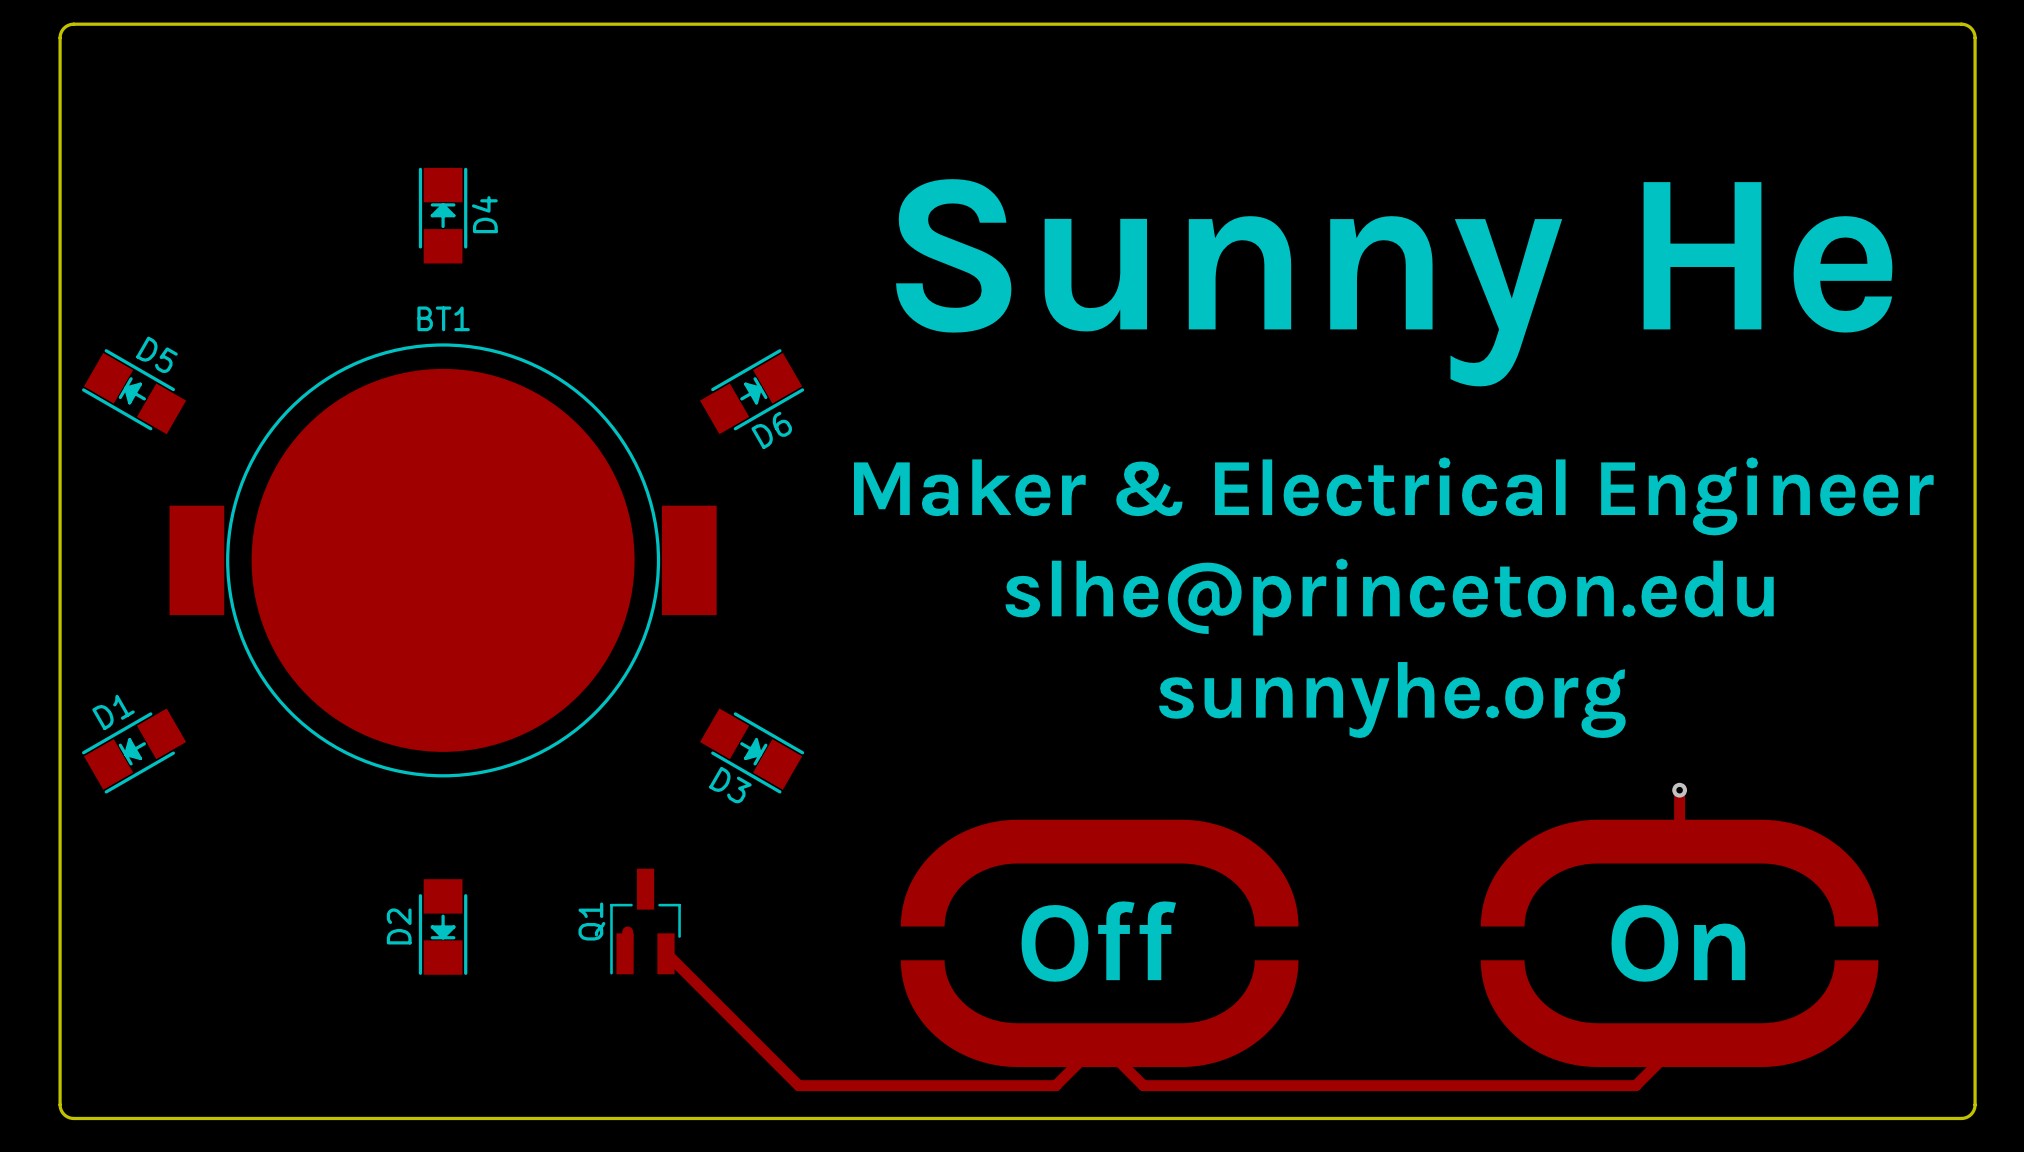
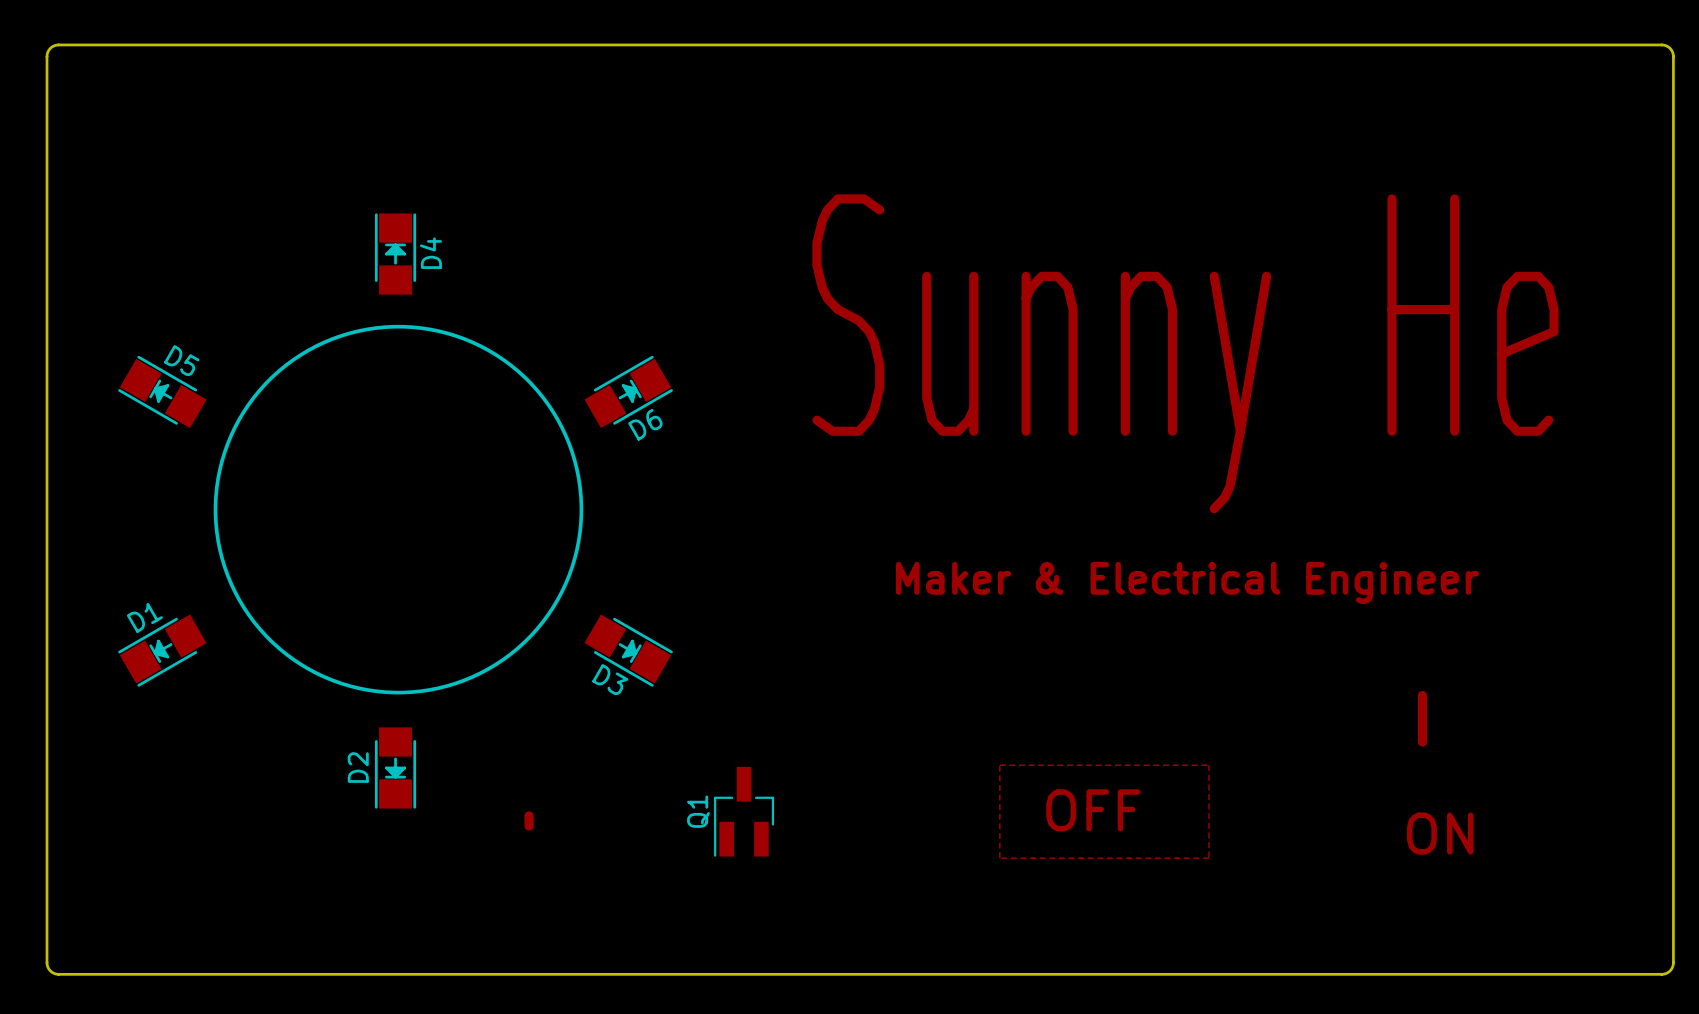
drawing: [854, 179, 1934, 982] -> none
D4 position: (443, 215) -> (395, 254)
drawing: none -> [213, 324, 584, 695]
text: none -> Sunny He (1185, 353)
D5 position: (134, 391) -> (162, 391)
D6 position: (752, 391) -> (628, 391)
BT1: (443, 560) -> none
text: none -> Maker & Electrical Engineer (1187, 582)
D1 position: (134, 750) -> (162, 650)
D3 position: (752, 750) -> (628, 650)
via: (1679, 790) -> none
top zone outline: none -> (999, 765) (1208, 765) (1208, 858) (999, 858) (999, 765)
part: (1099, 873) -> none
part: (1679, 873) -> none
Q1 position: (645, 921) -> (744, 811)
text: none -> OFF (1093, 810)
D2 position: (443, 927) -> (395, 768)
text: none -> ON (1440, 833)
top track: (667, 954) (798, 1085) (1055, 1085) (1099, 1041) (1143, 1085) (1635, 1085) (1679, 1041) -> none
part: (1099, 1013) -> none
part: (1679, 1013) -> none

